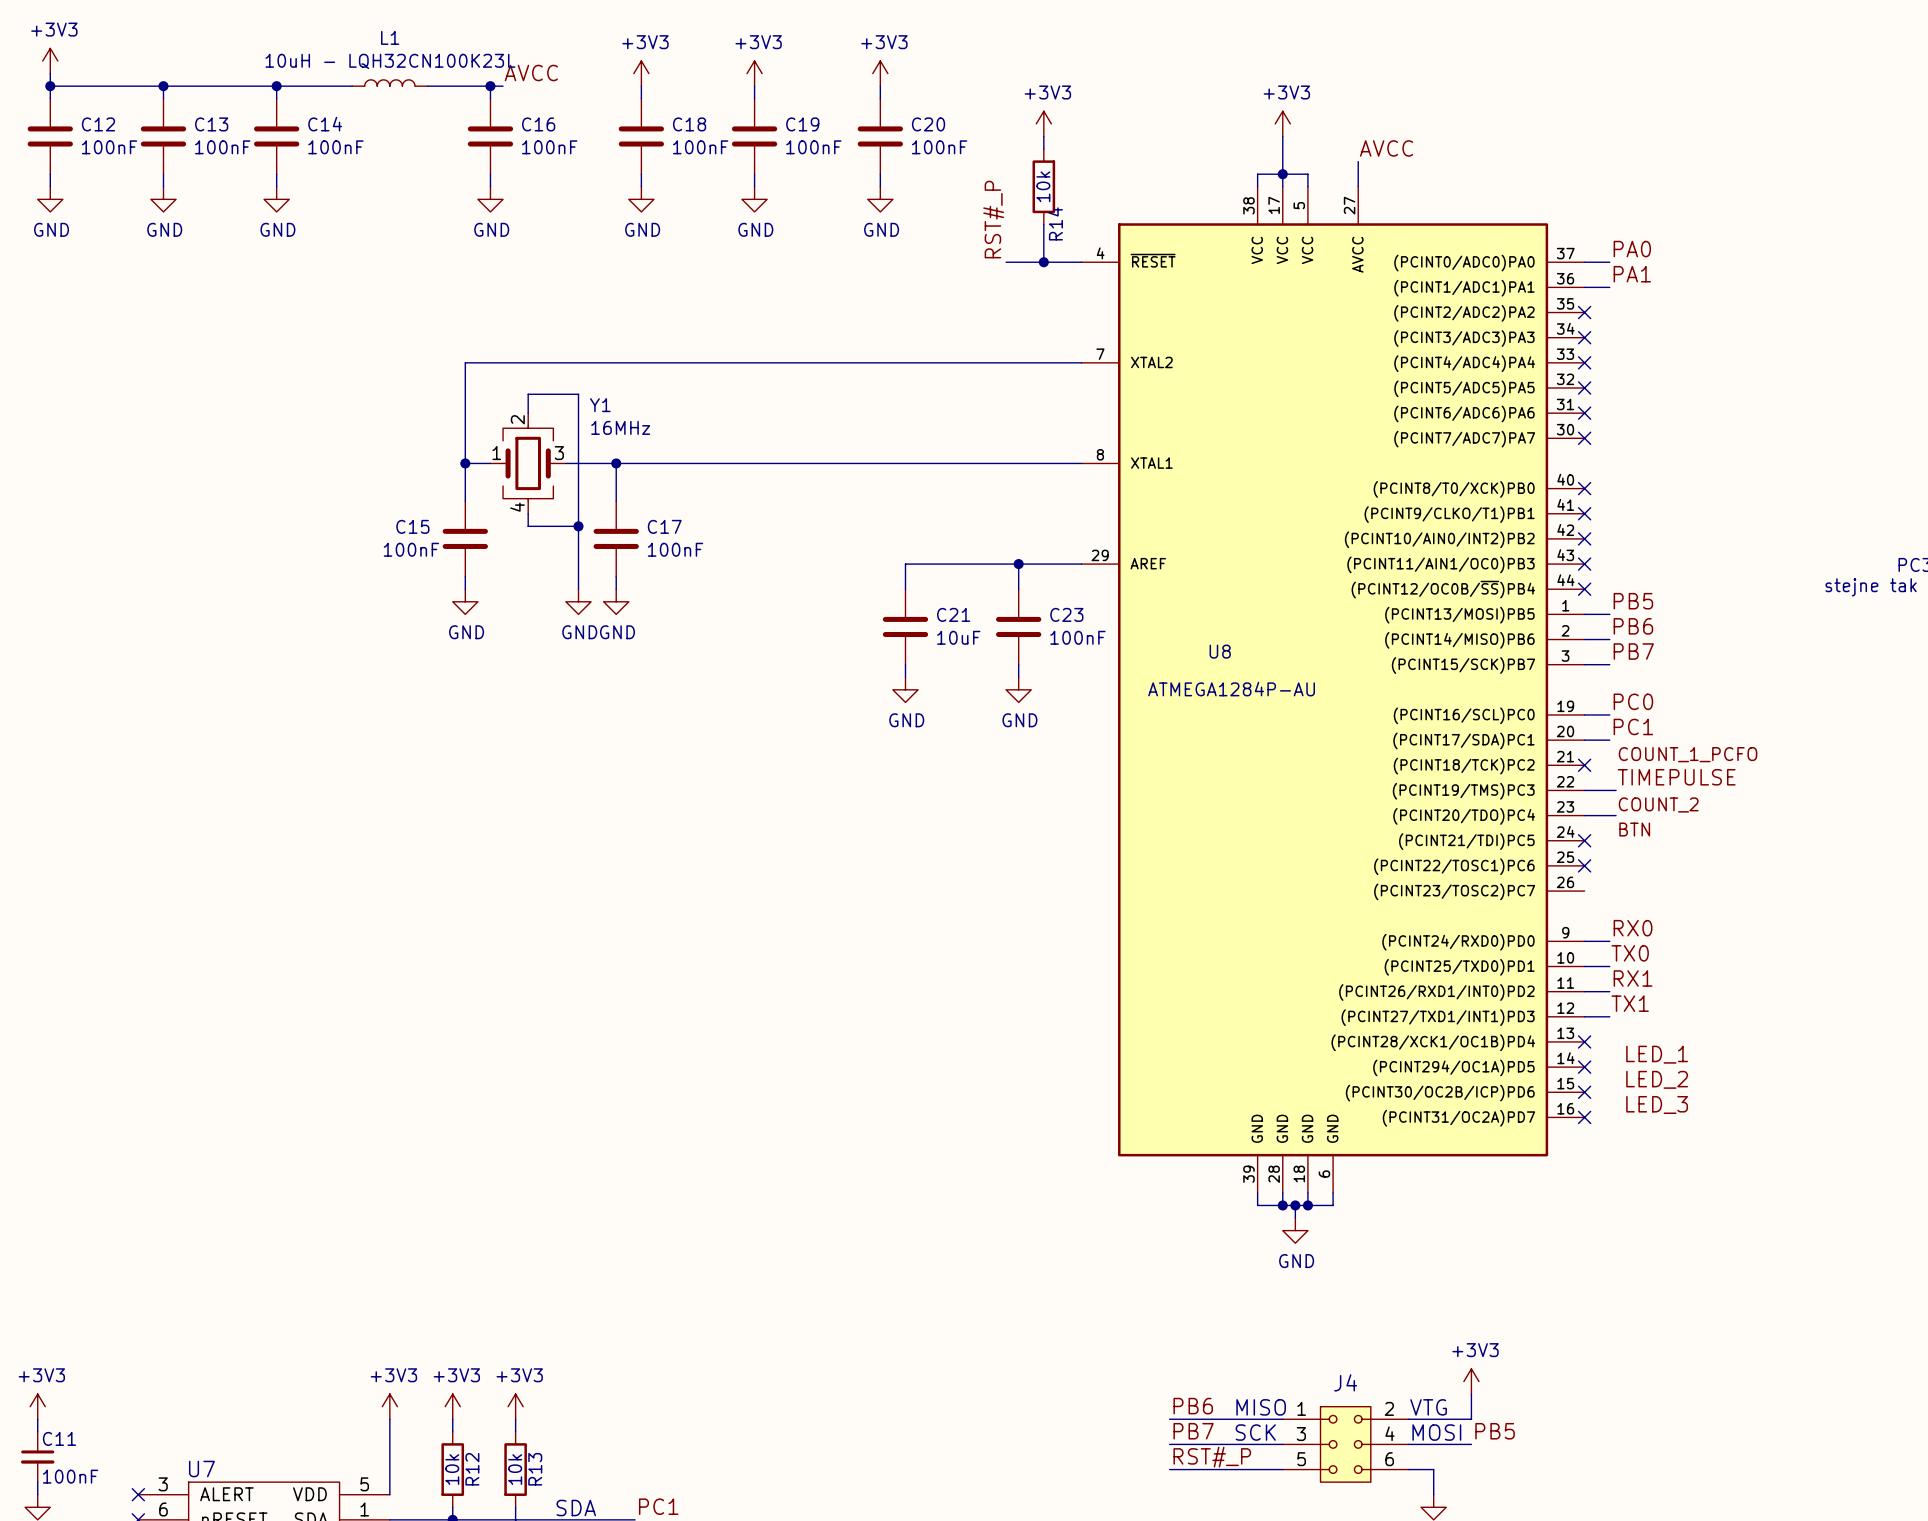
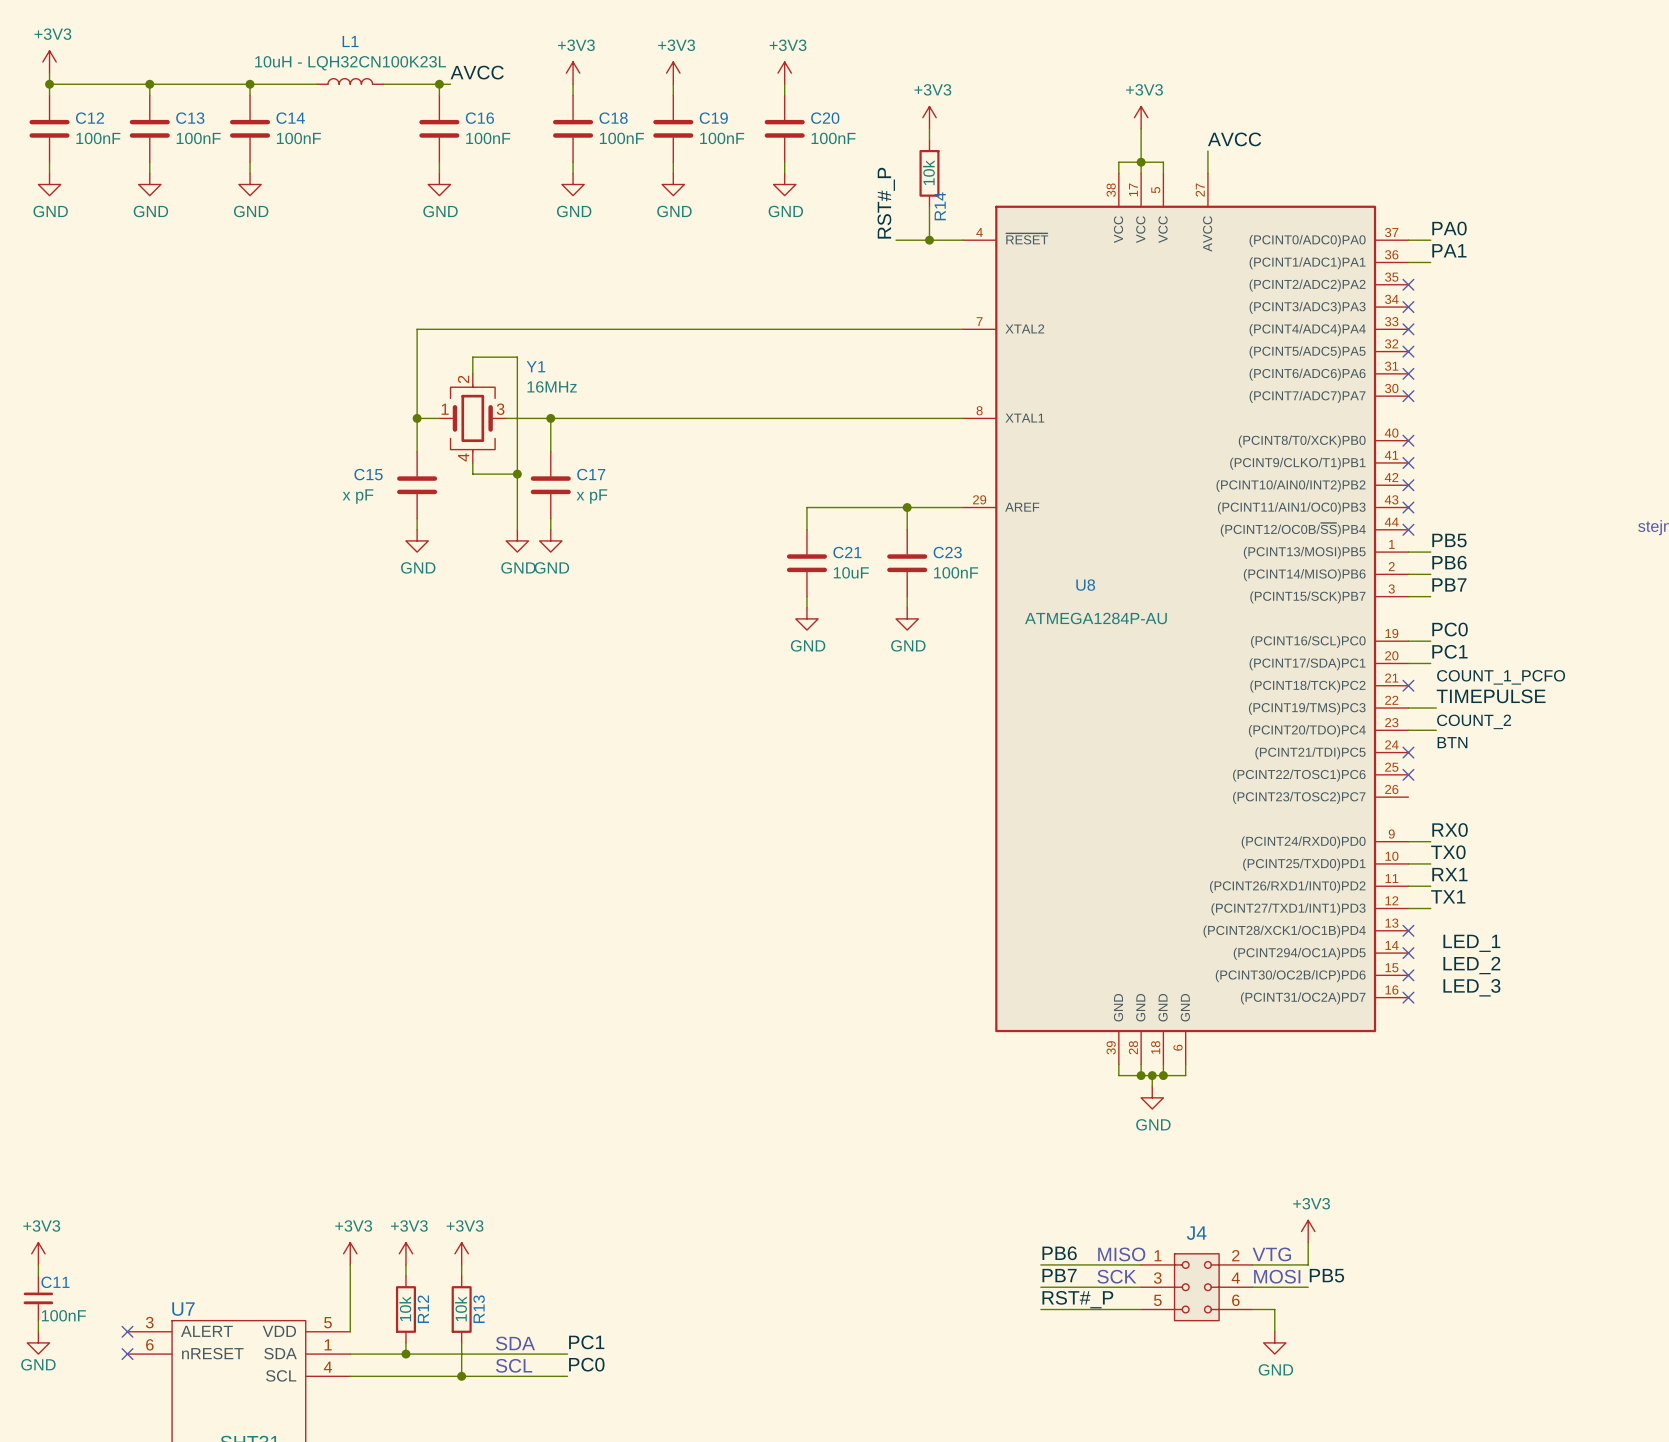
C15 value: 100nF (411, 549) -> x pF (357, 496)
C17 value: 100nF (675, 549) -> x pF (591, 496)

